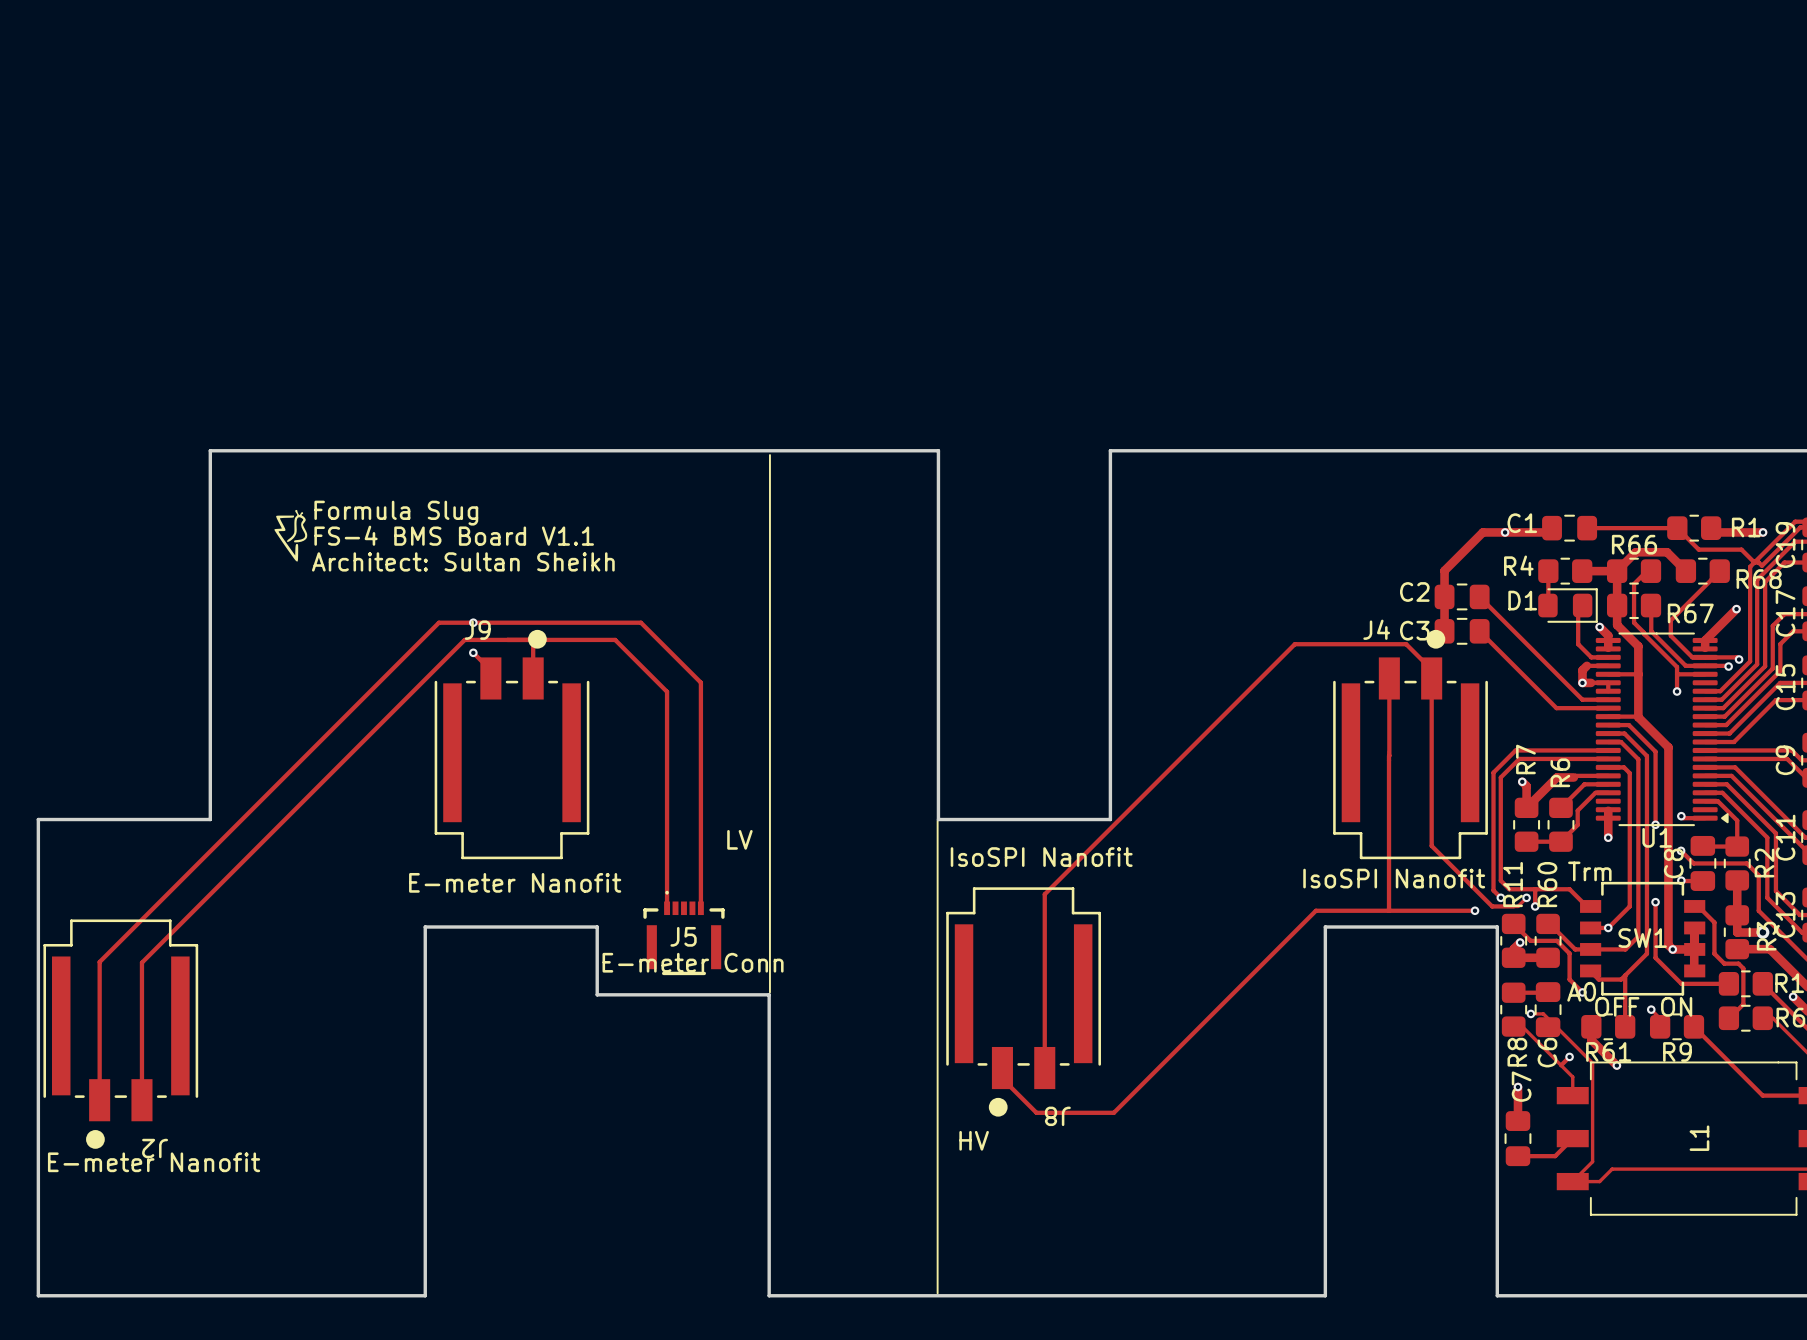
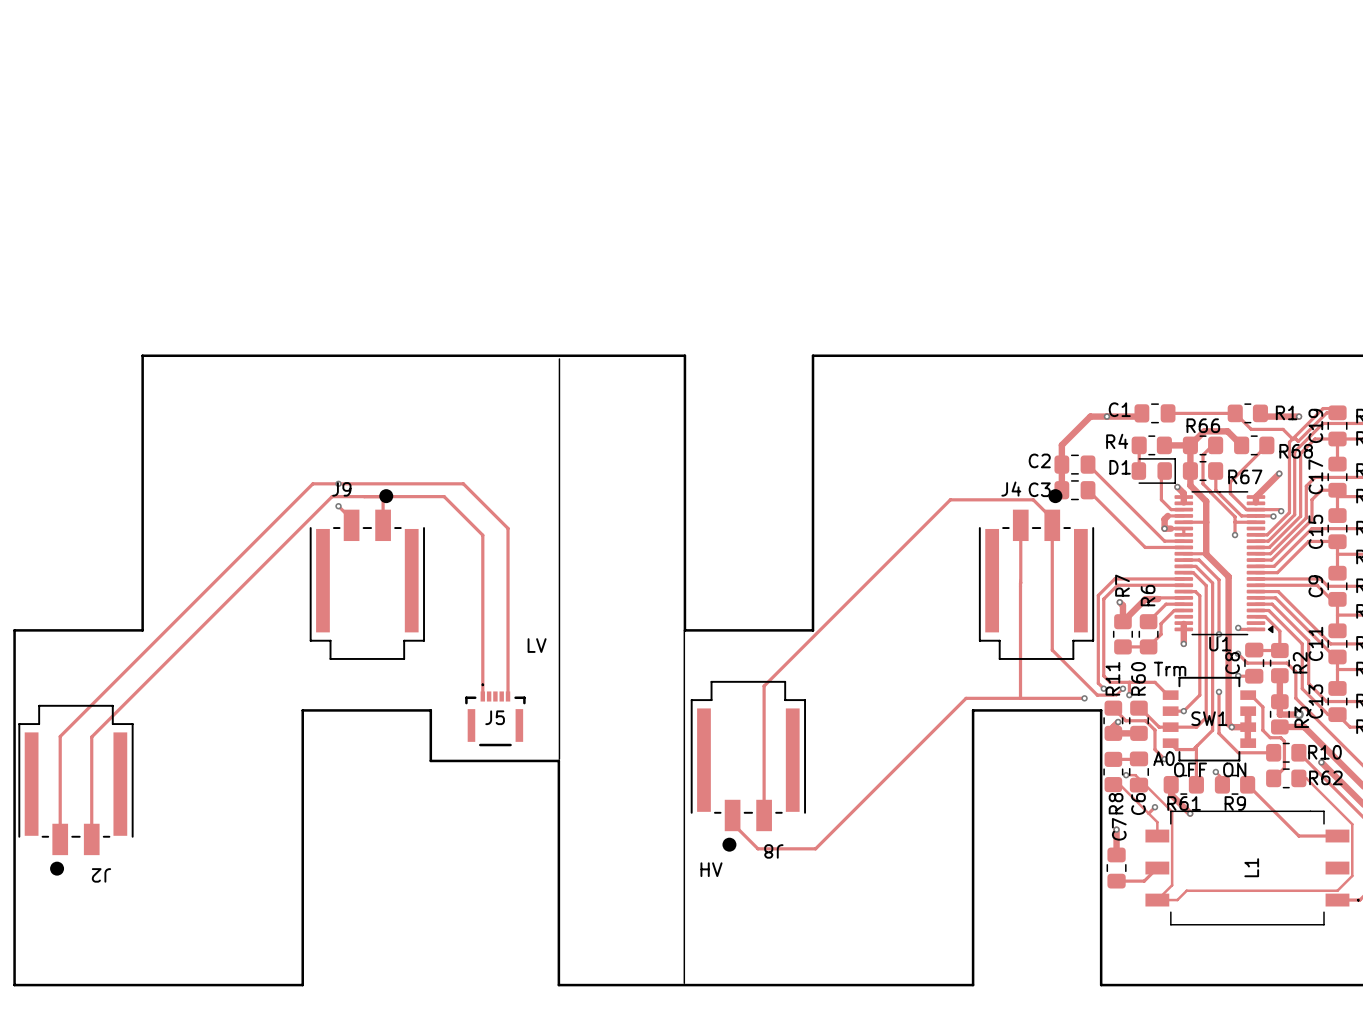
drawing: [274, 509, 308, 562] -> none
text: IsoSPI Nanofit (1041, 857) -> none
text: IsoSPI Nanofit (1394, 878) -> none
text: E-meter Nanofit (515, 882) -> none
text: E-meter Conn (693, 962) -> none
text: E-meter Nanofit (154, 1162) -> none

